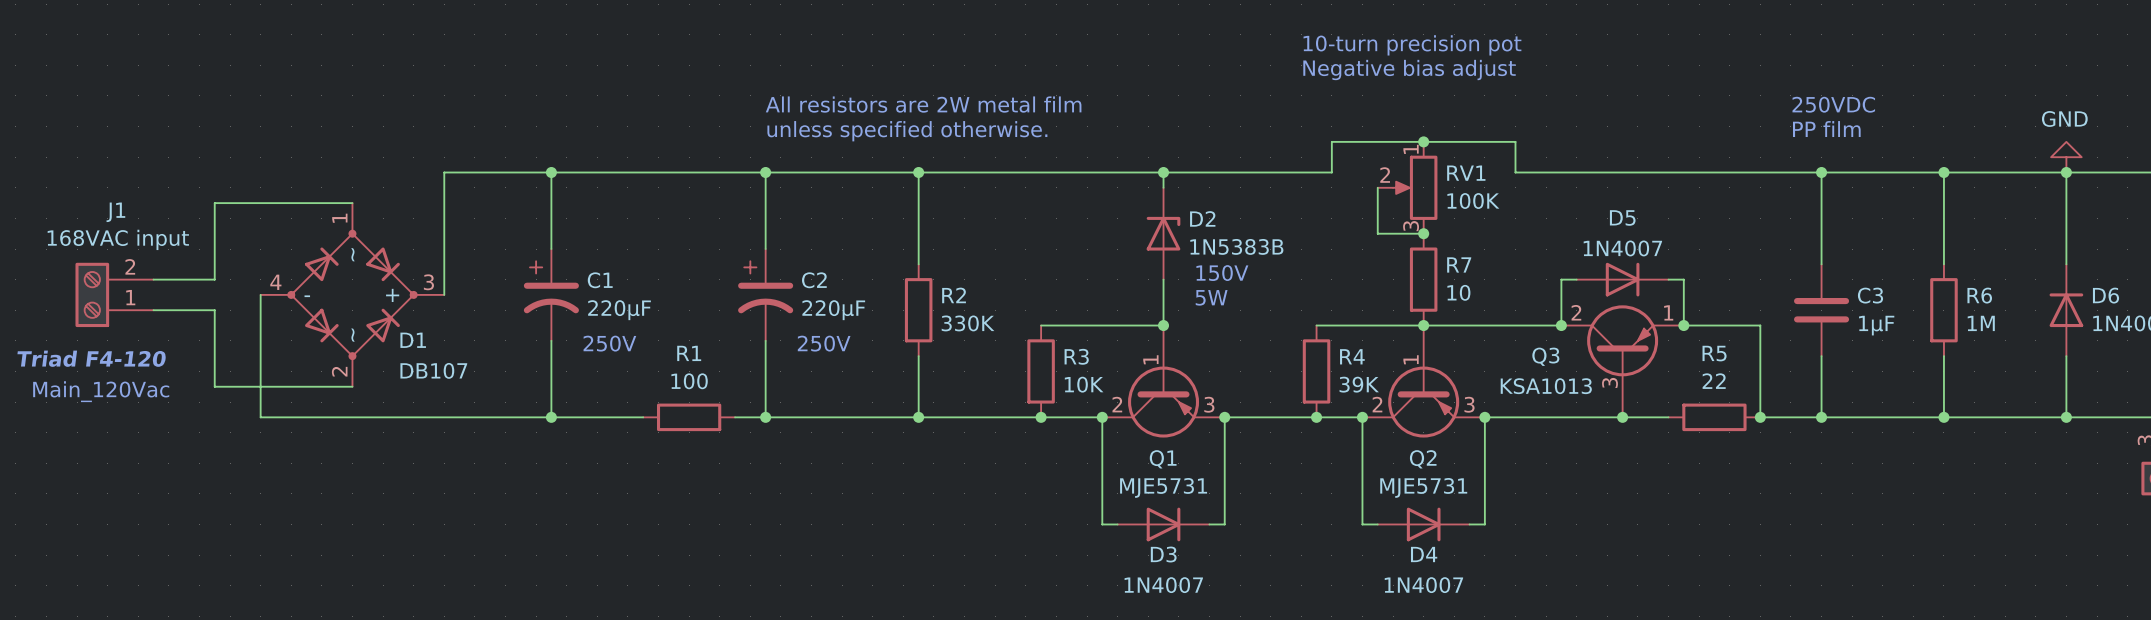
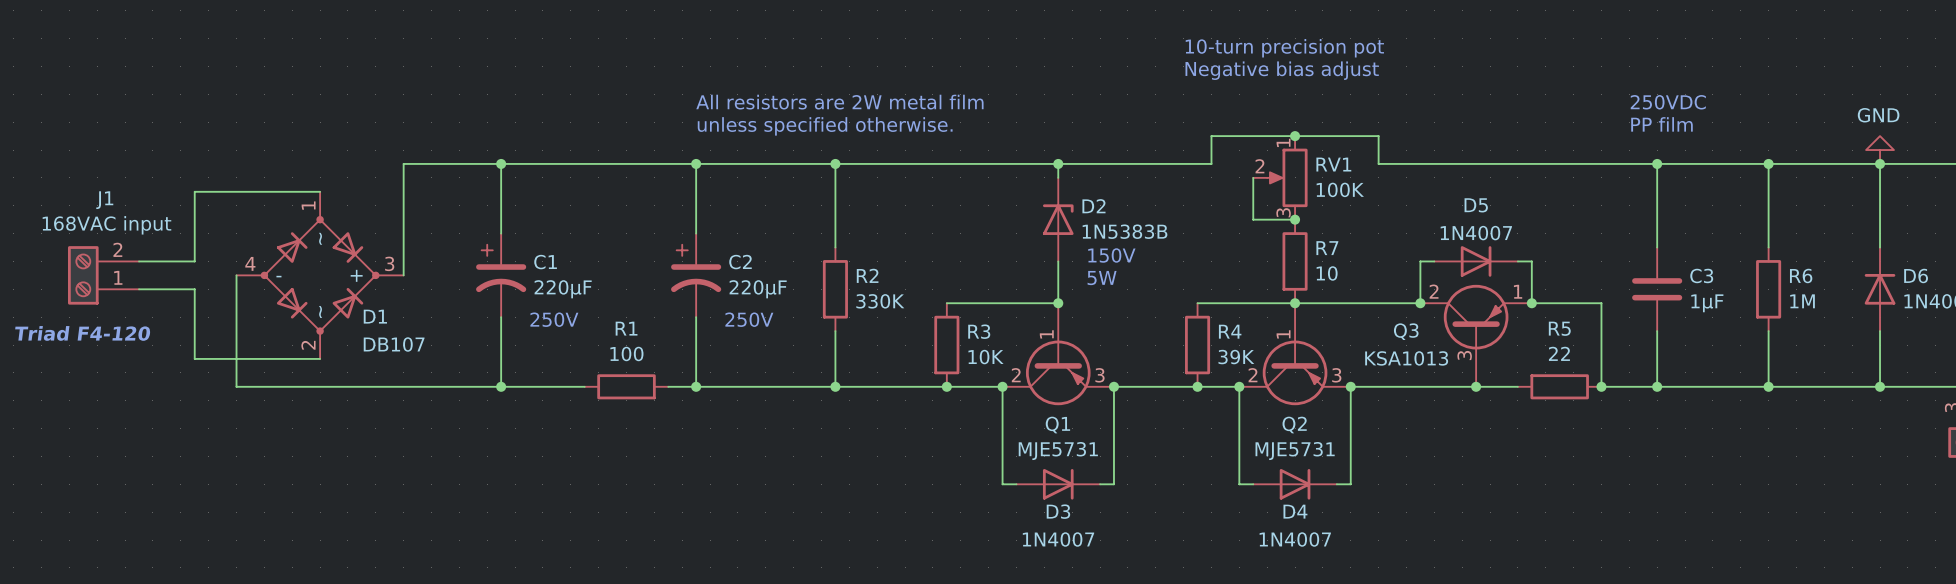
text: Main_120Vac (101, 391) -> none

